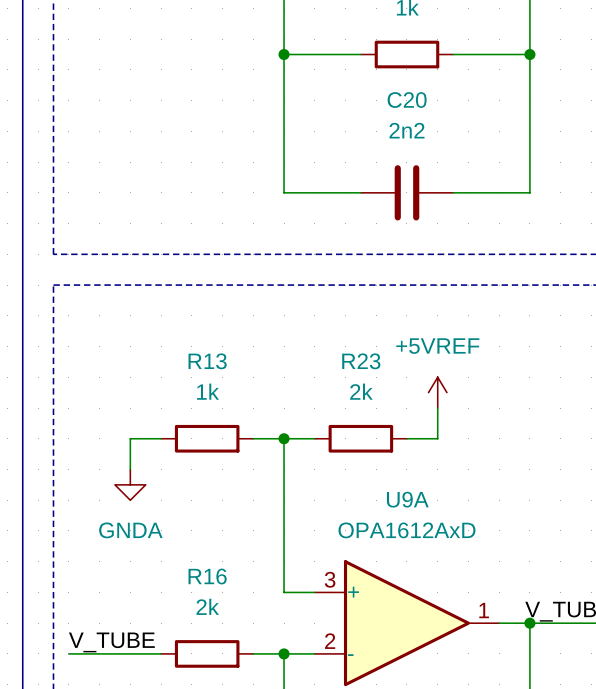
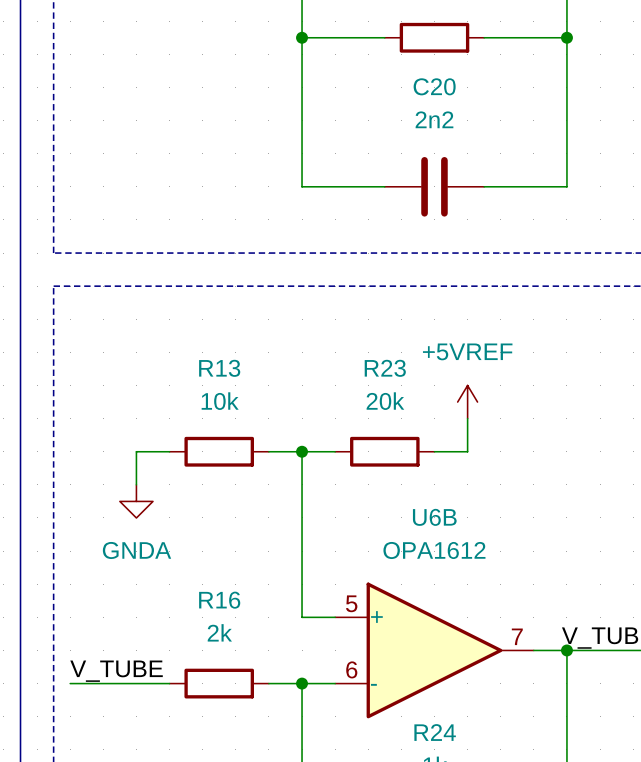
R13 value: 1k (208, 391) -> 10k (220, 401)
R23 value: 2k (361, 391) -> 20k (385, 401)
U9A name: U9A (407, 499) -> U6B (434, 517)
U9A value: OPA1612AxD (406, 530) -> OPA1612 (434, 550)
U9A pin number: 3 (330, 579) -> 5 (351, 603)
U9A pin number: 1 (484, 610) -> 7 (517, 636)
U9A pin number: 2 (330, 641) -> 6 (351, 669)

